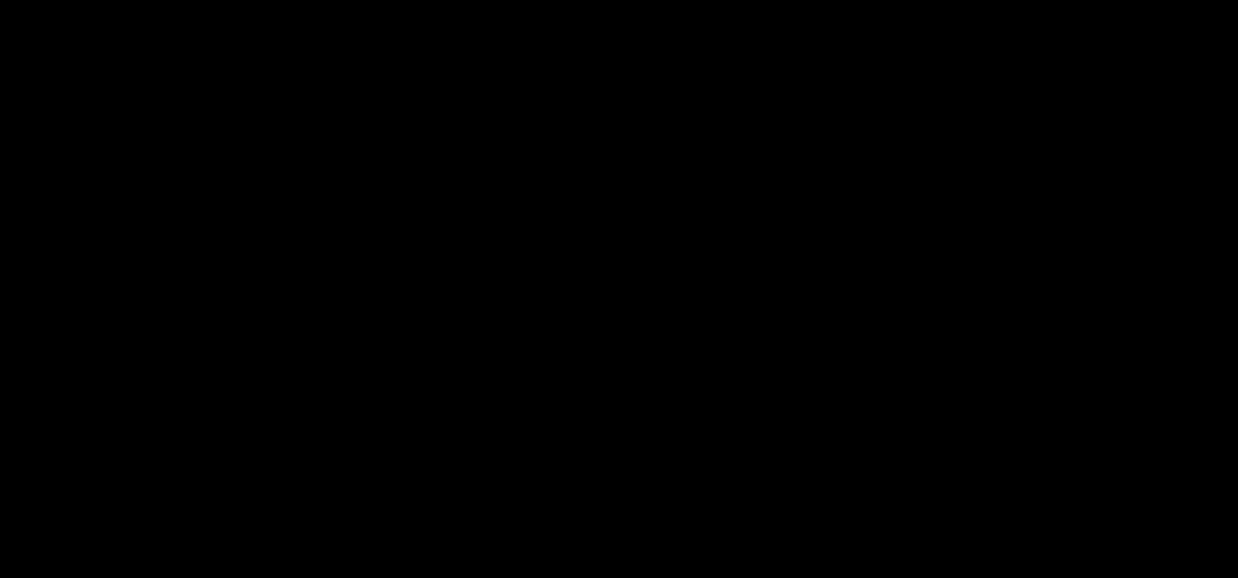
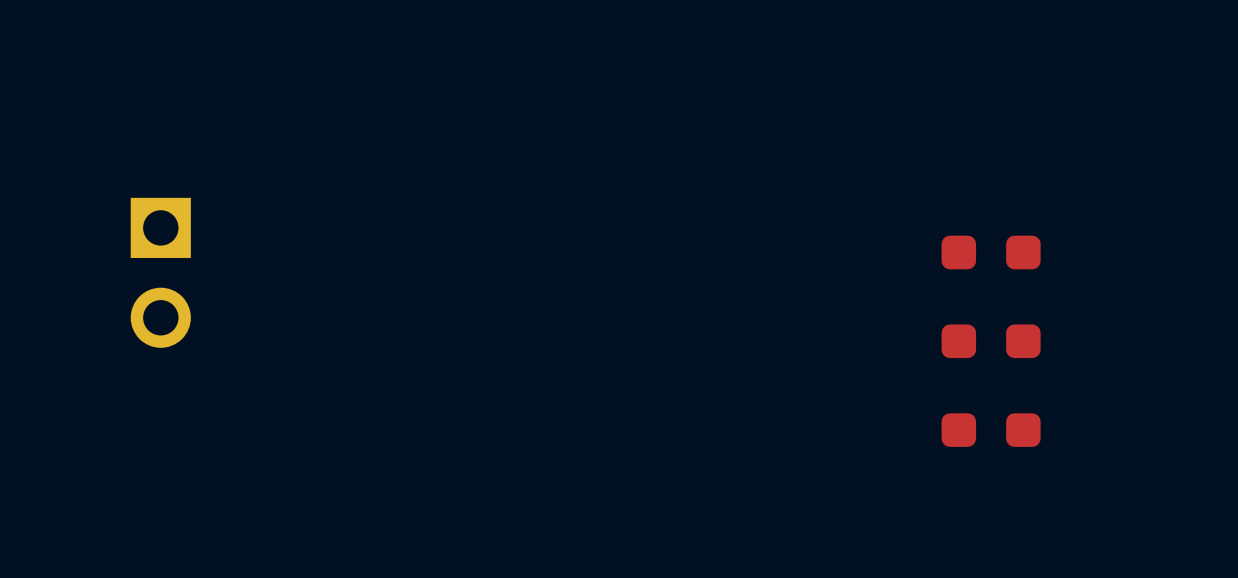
part: none -> (991, 252)
part: none -> (160, 272)
part: none -> (991, 341)
part: none -> (991, 430)

